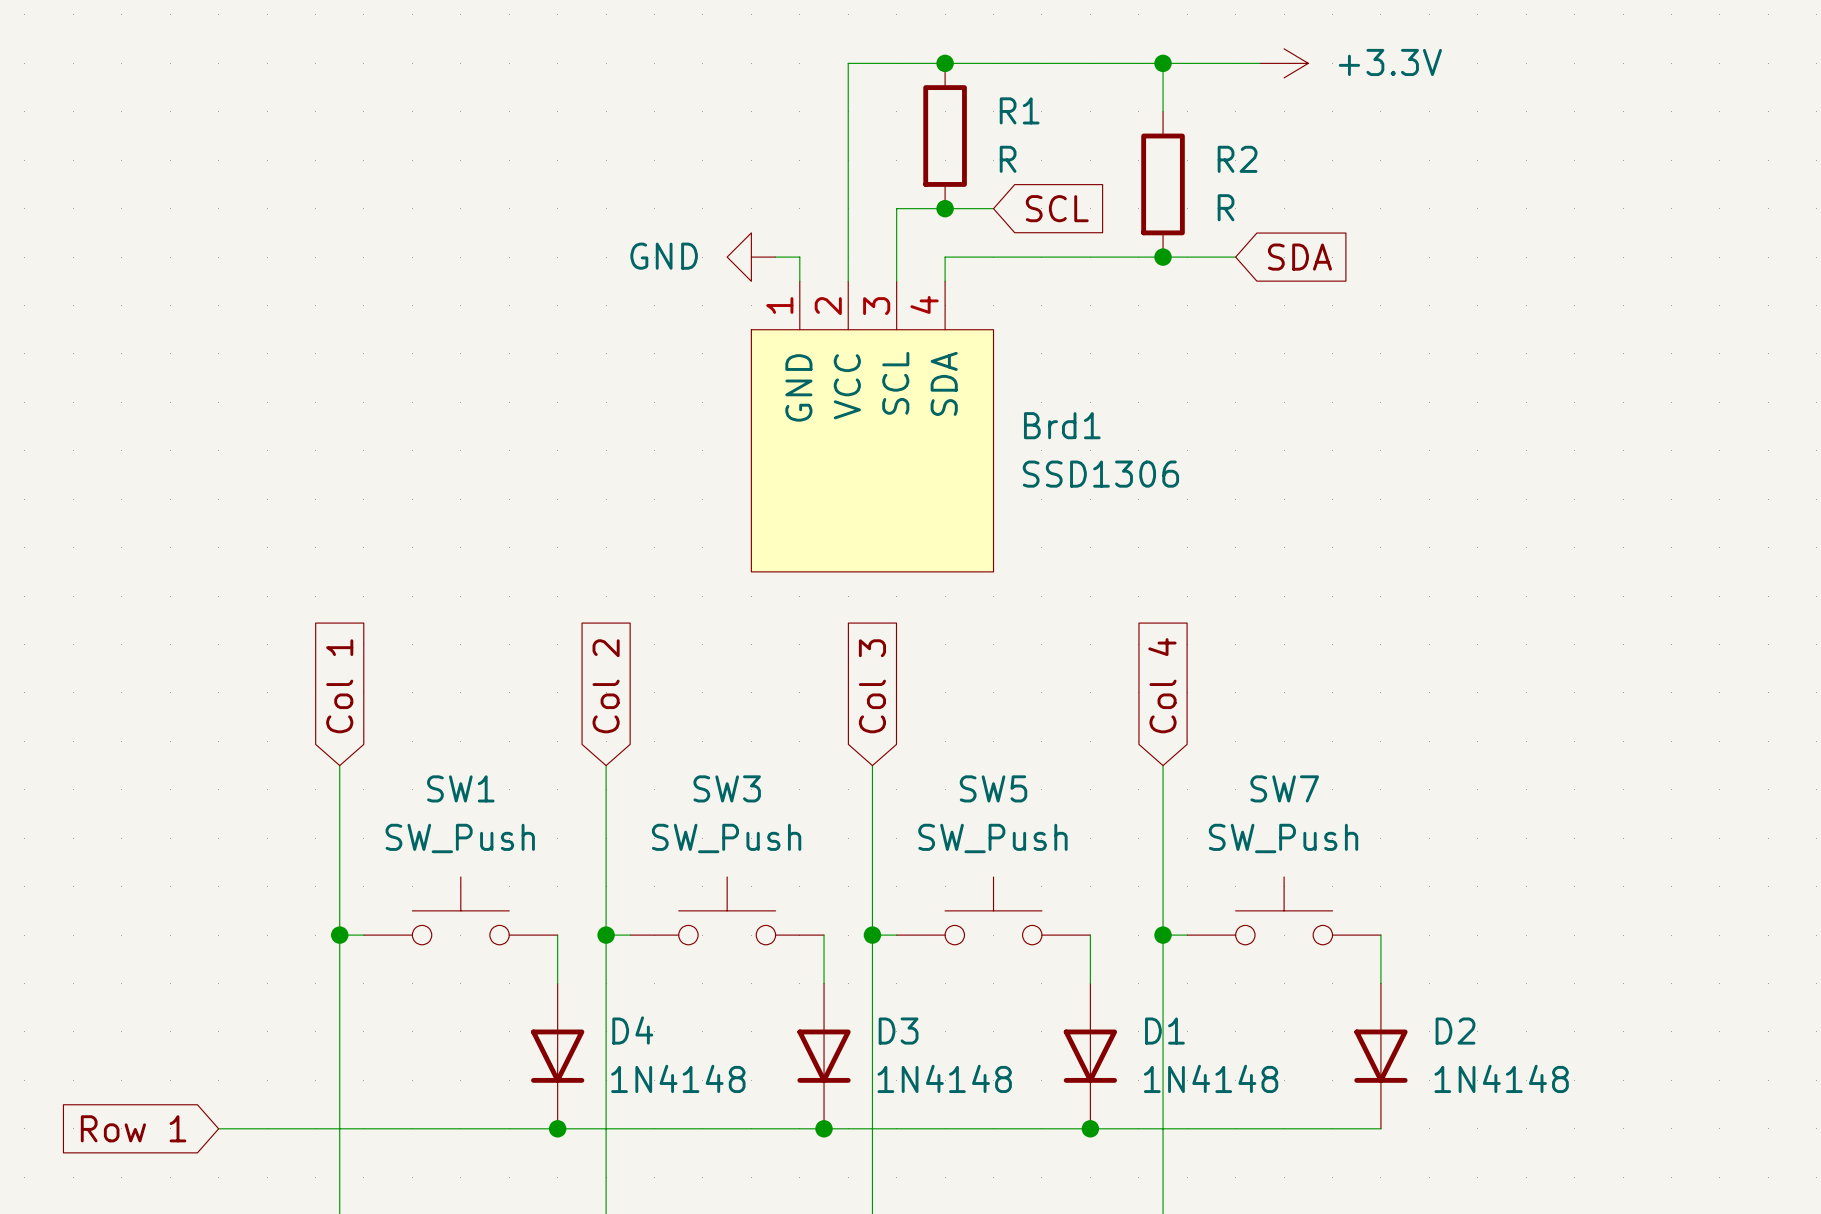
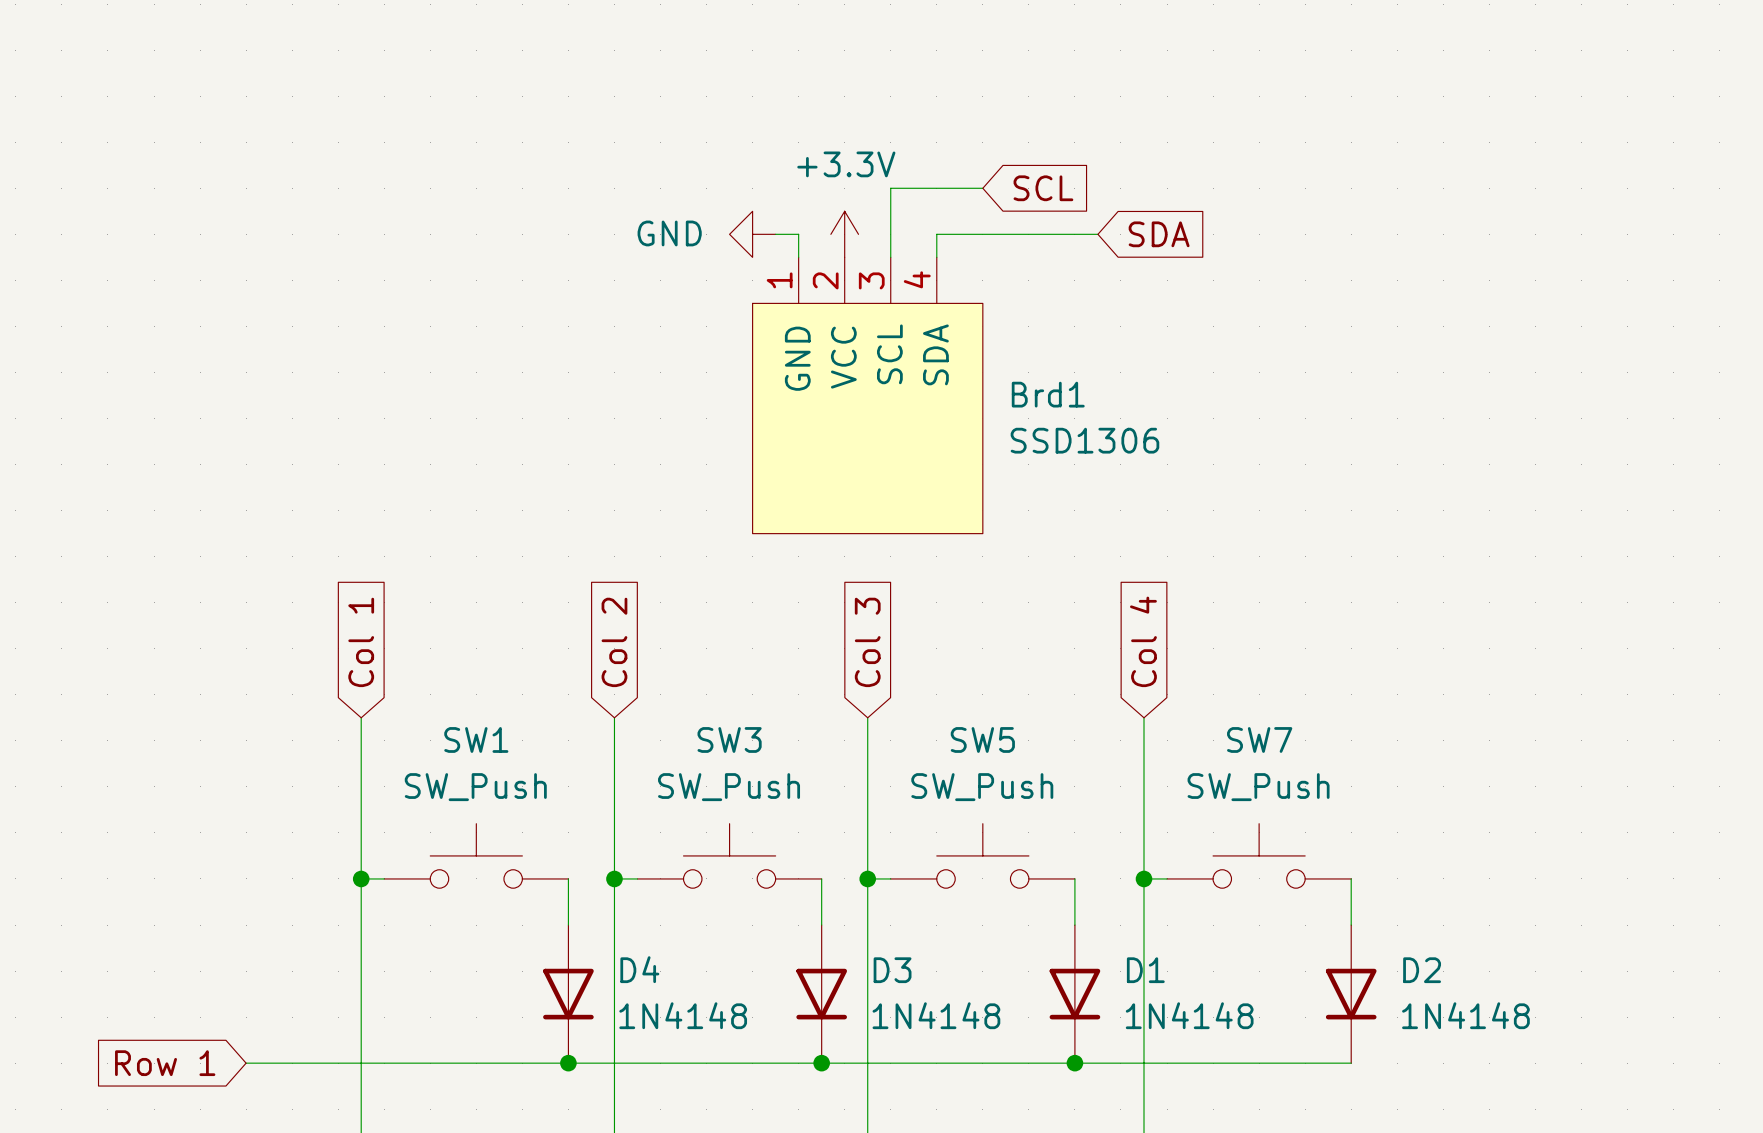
junction: (945, 63) -> none
wire: (1163, 63) (1163, 111) -> none
junction: (1163, 63) -> none
wire: (1259, 63) (848, 63) (848, 281) -> none
power symbol: +3.3V (1284, 63) -> none
R1: R (945, 136) -> none
R2: R (1163, 184) -> none
junction: (945, 208) -> none
power symbol: none -> +3.3V (844, 234)
wire: (1114, 257) (1235, 257) -> none
junction: (1163, 257) -> none
global label position: SDA (1299, 257) -> SDA (1159, 234)

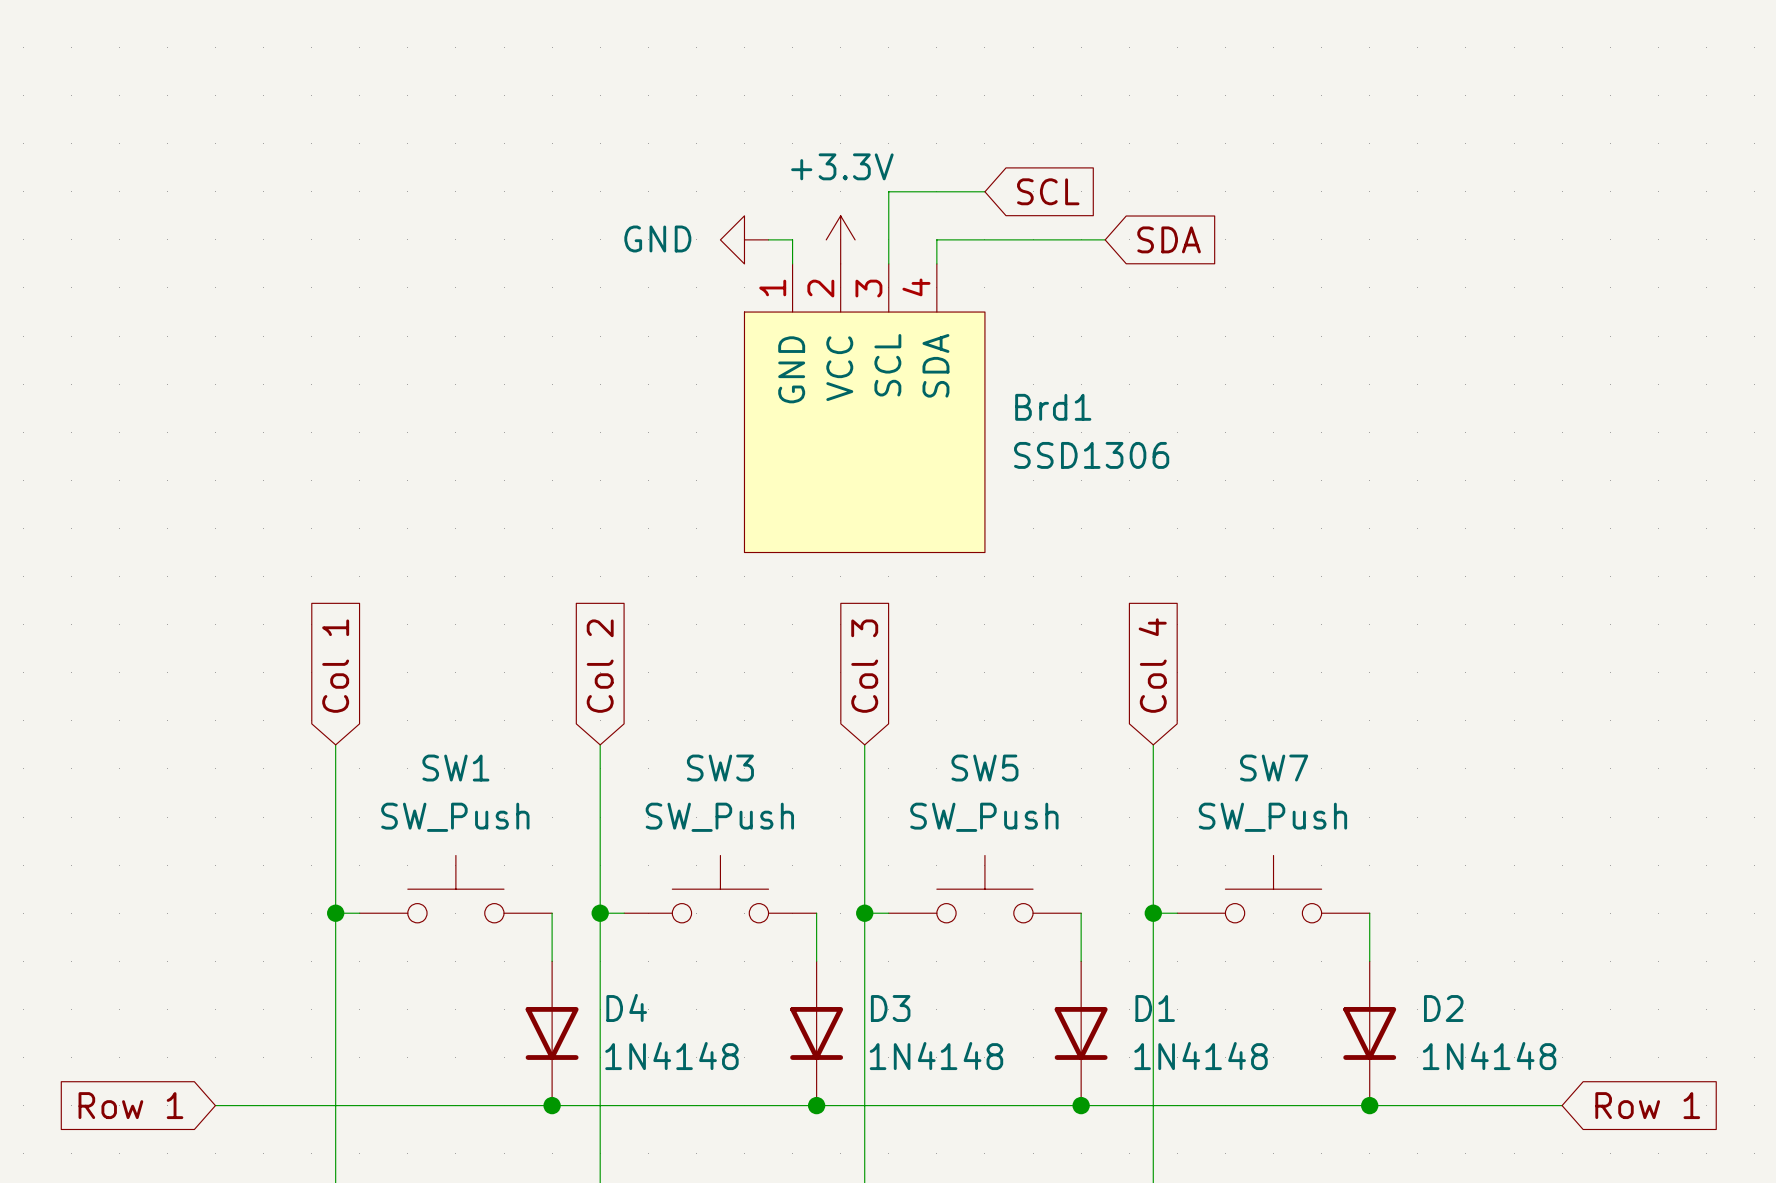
wire: none -> (1369, 1105) (1562, 1105)
junction: none -> (1369, 1105)
global label: none -> Row 1 (1647, 1105)

